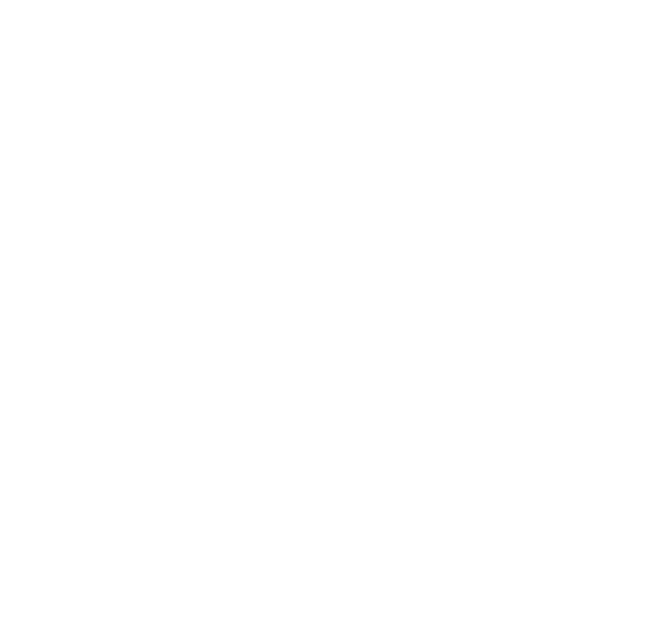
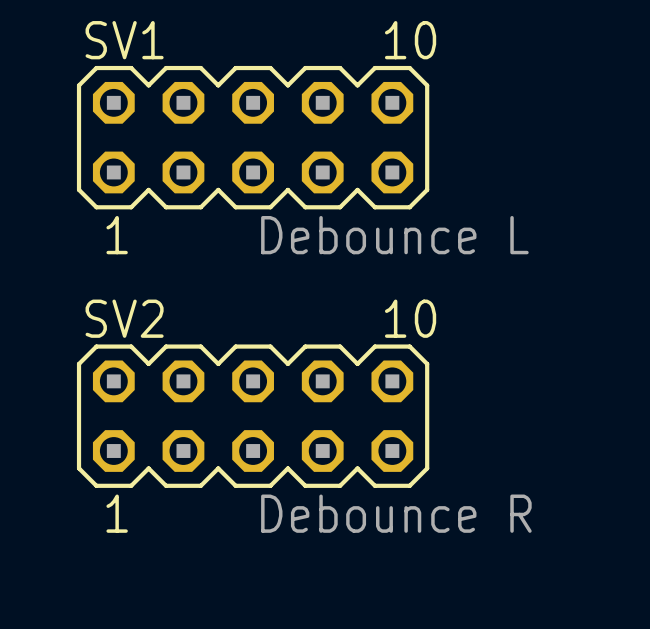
SV1: none -> Debounce L (253, 137)
SV2: none -> Debounce R (253, 416)

